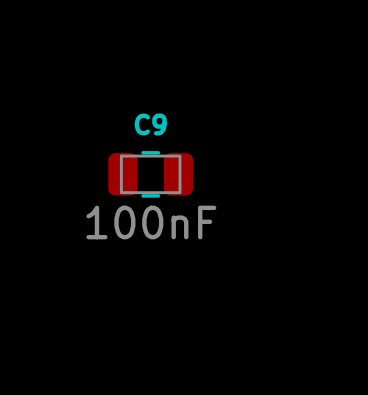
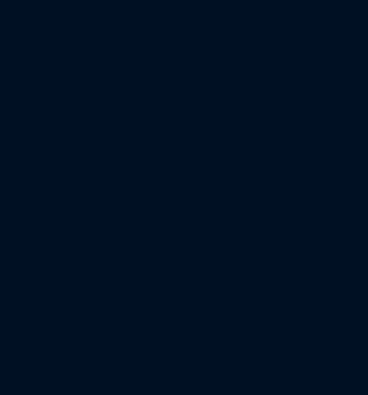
C9: 100nF (150, 174) -> none

